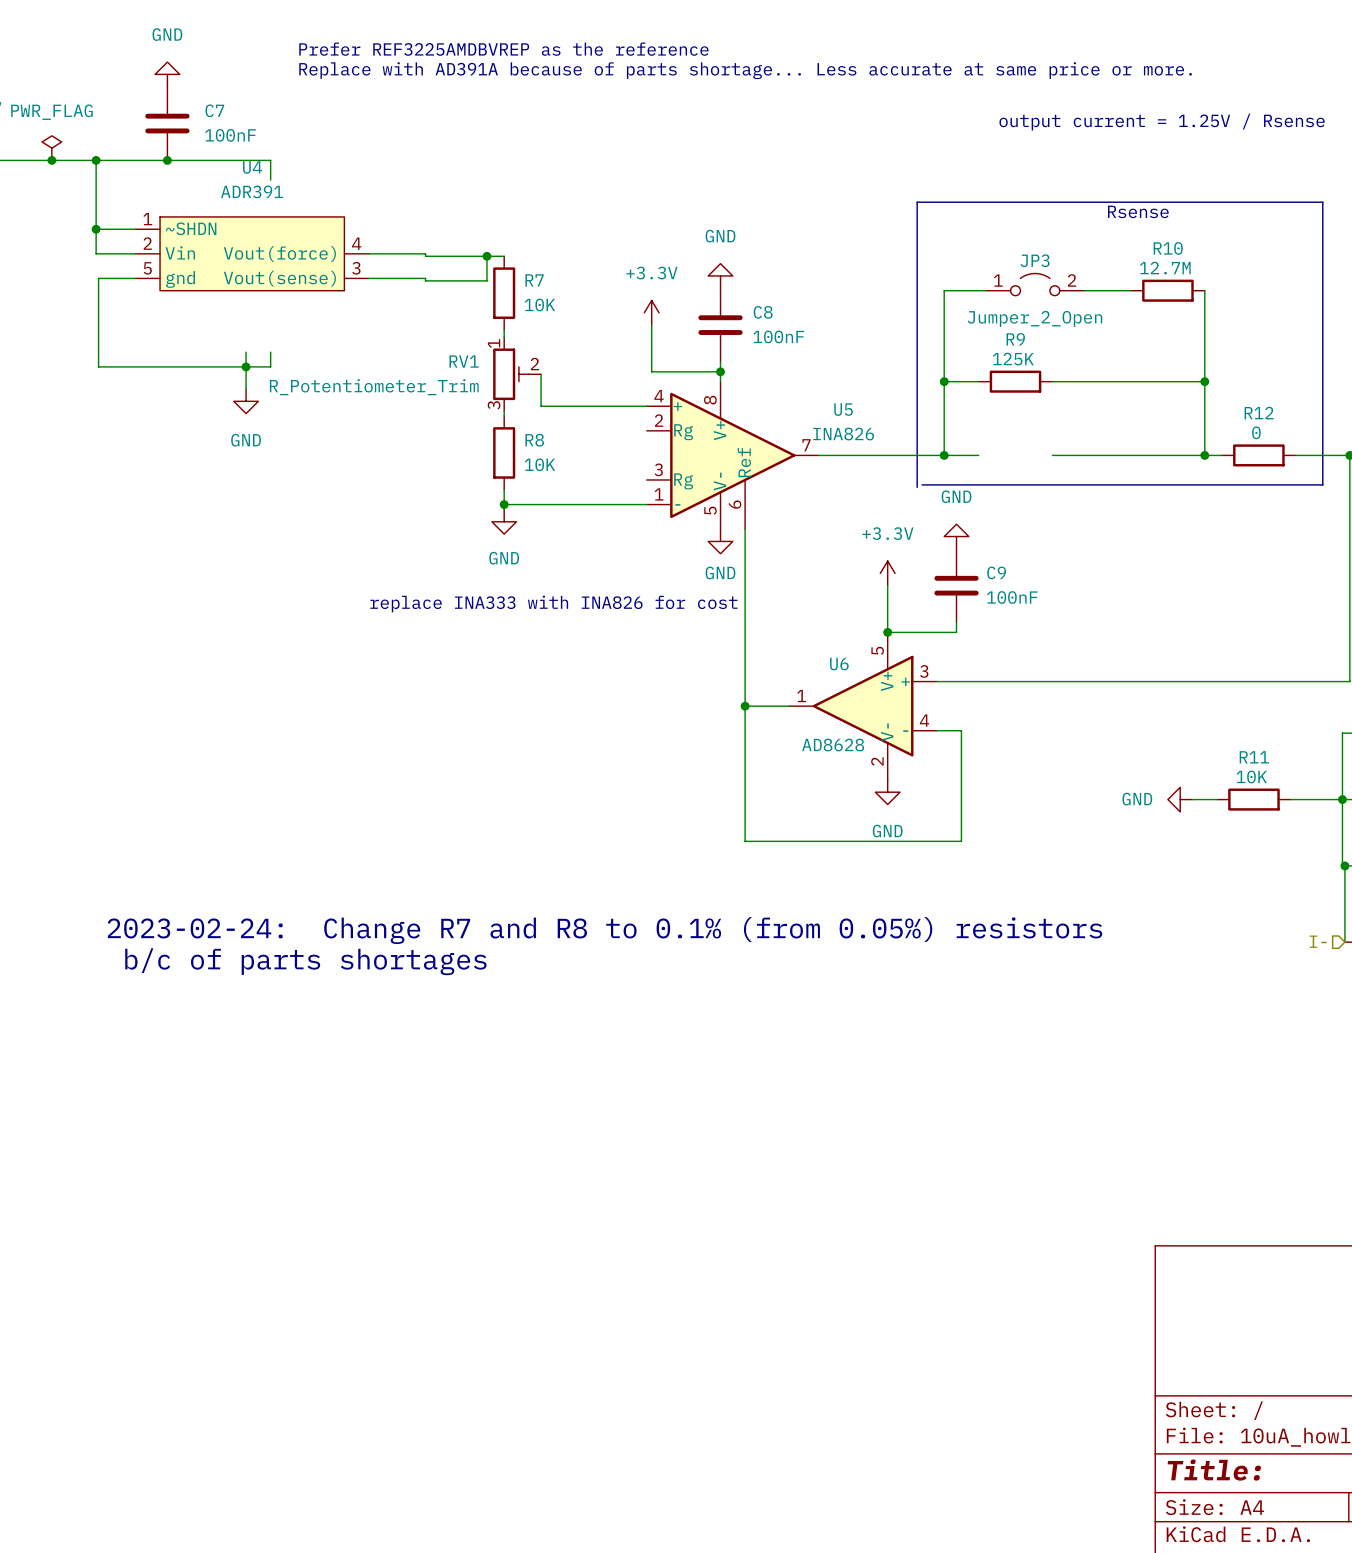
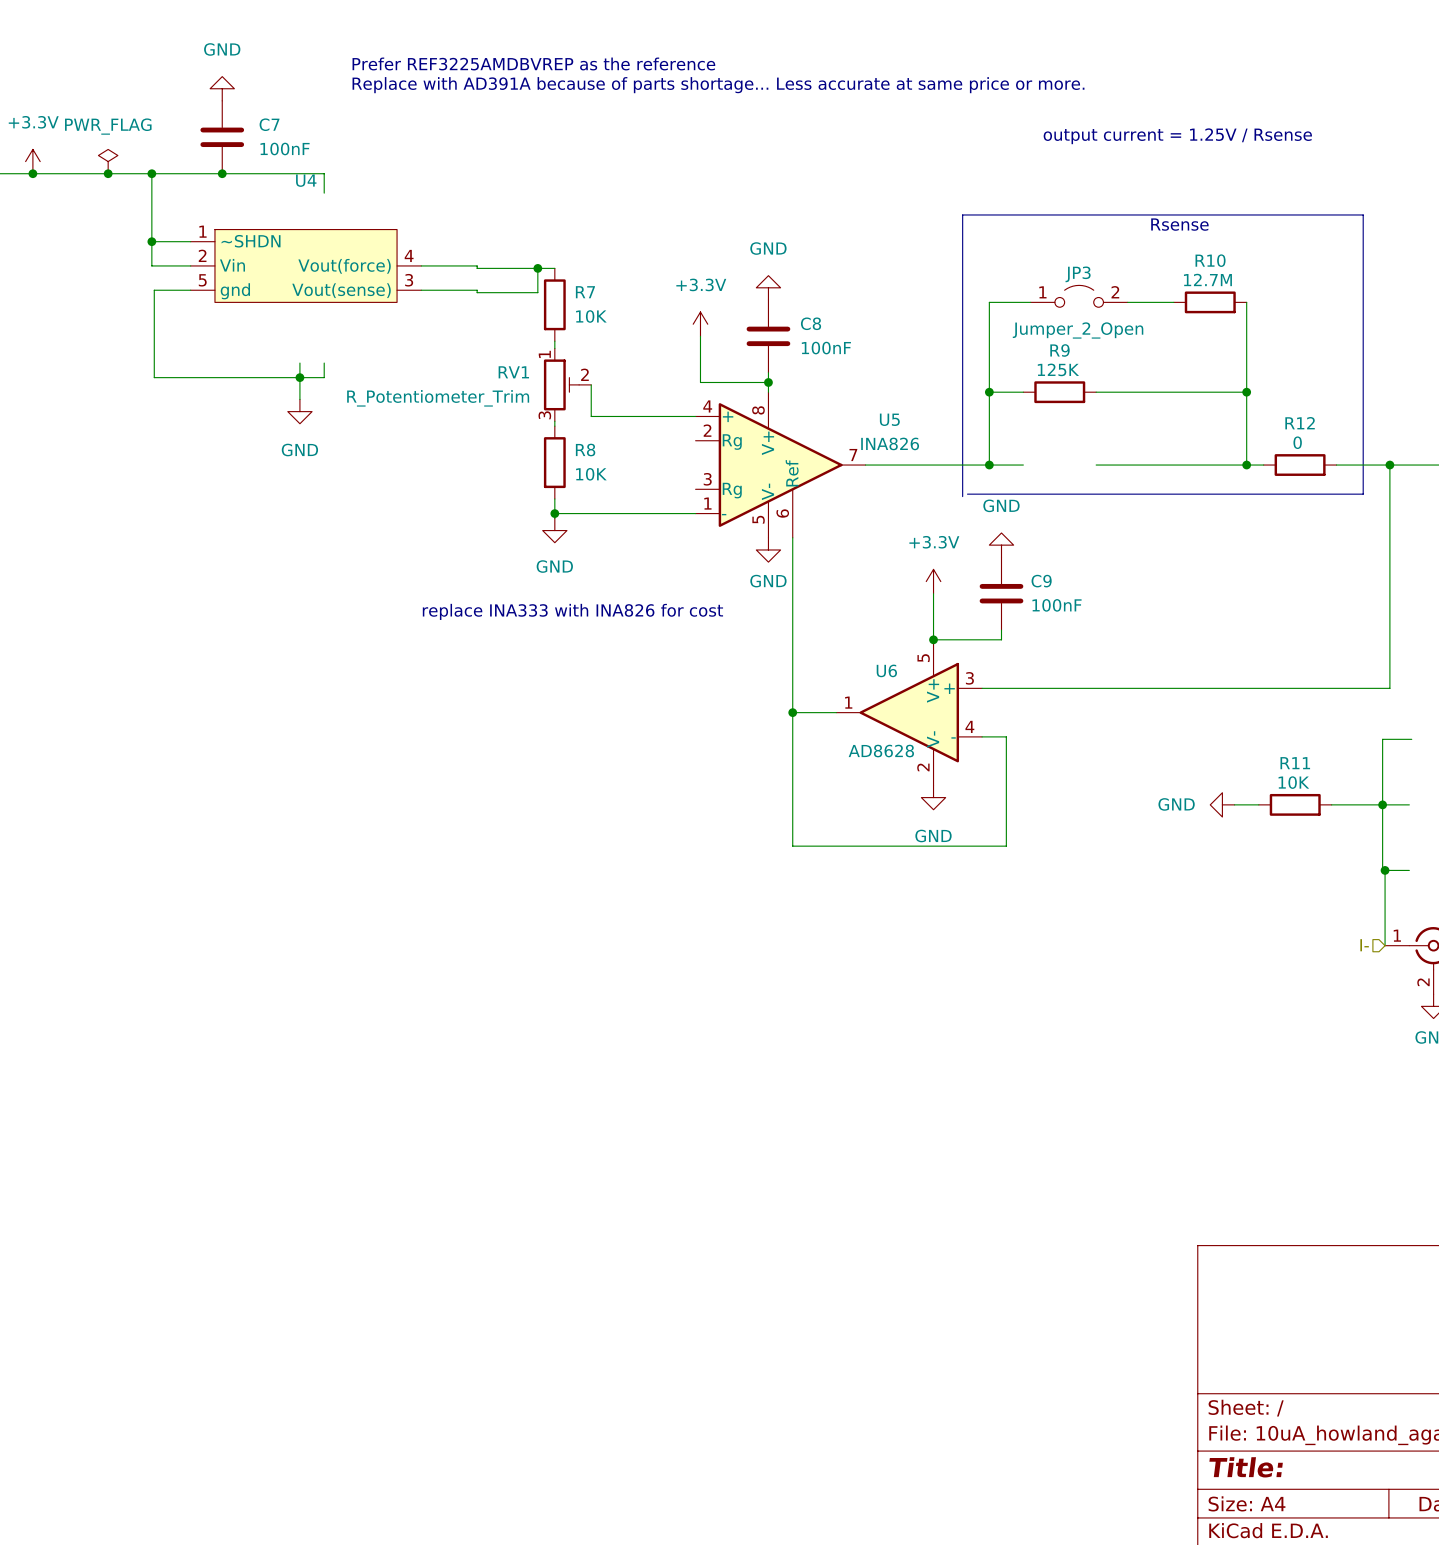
U4 value: ADR391 (252, 191) -> none
text: 2023-02-24: Change R7 and R8 to 0.1% (from 0.05%) resistors (604, 930) -> none
text: b/c of parts shortages (305, 961) -> none

